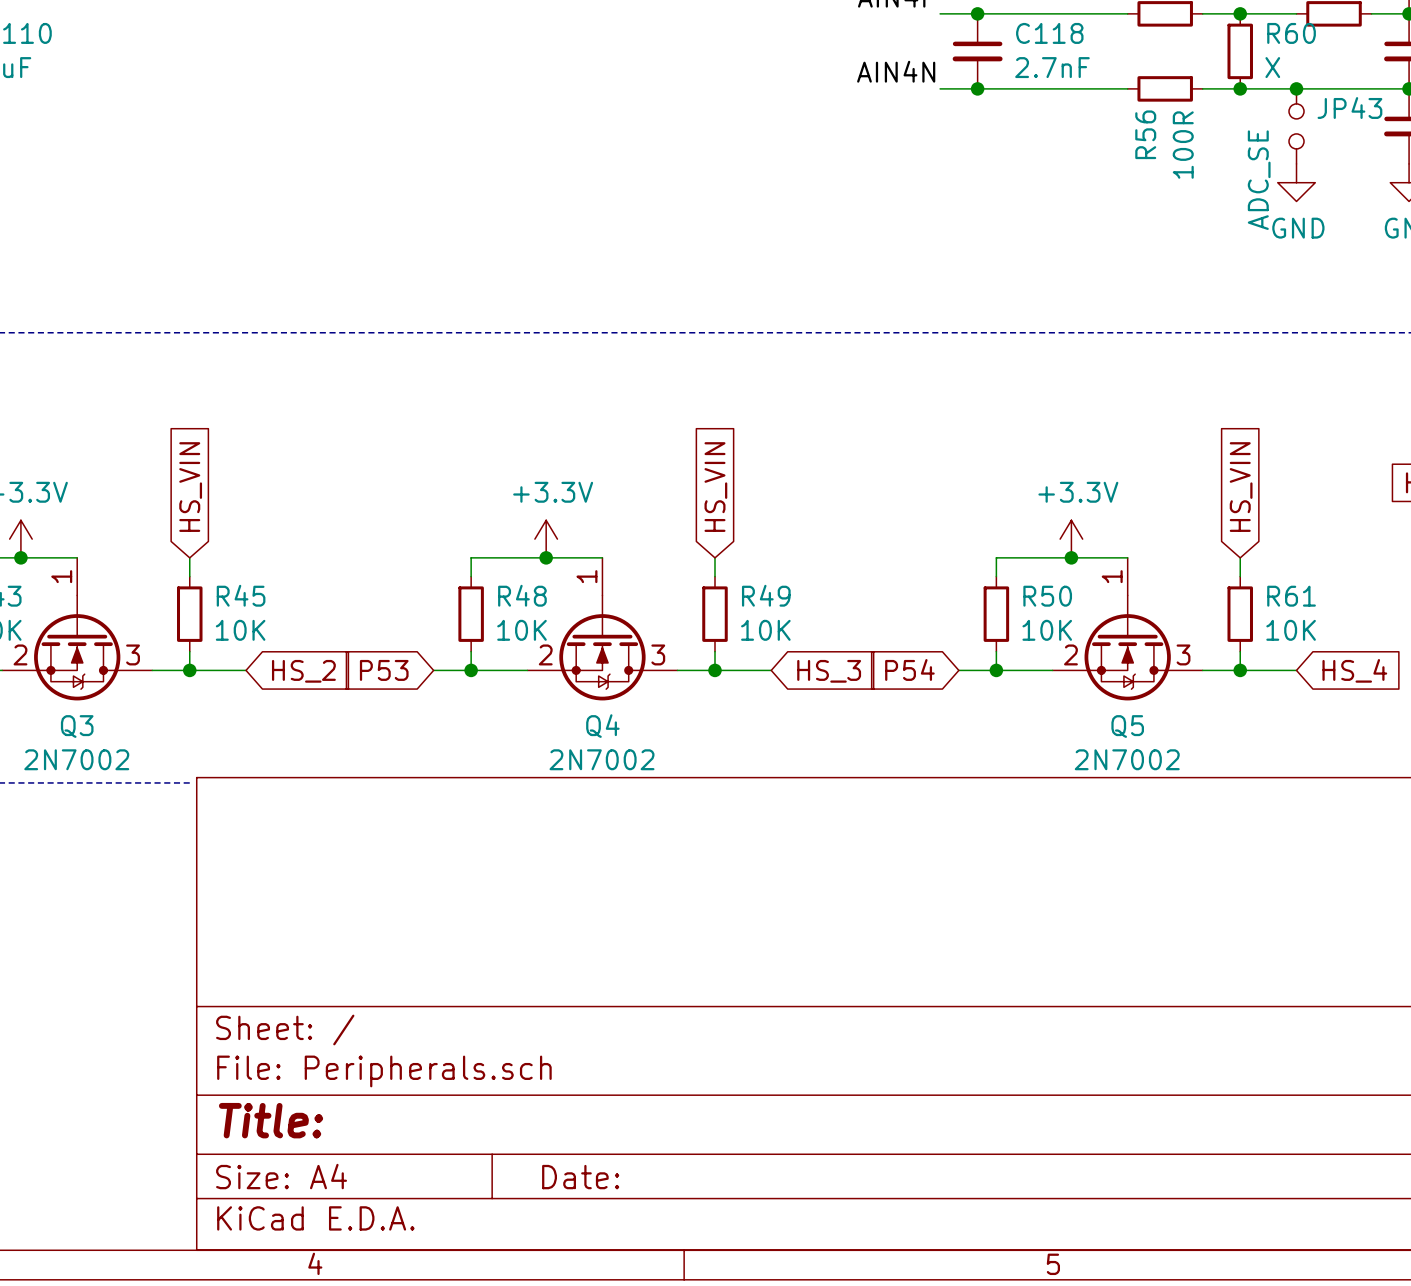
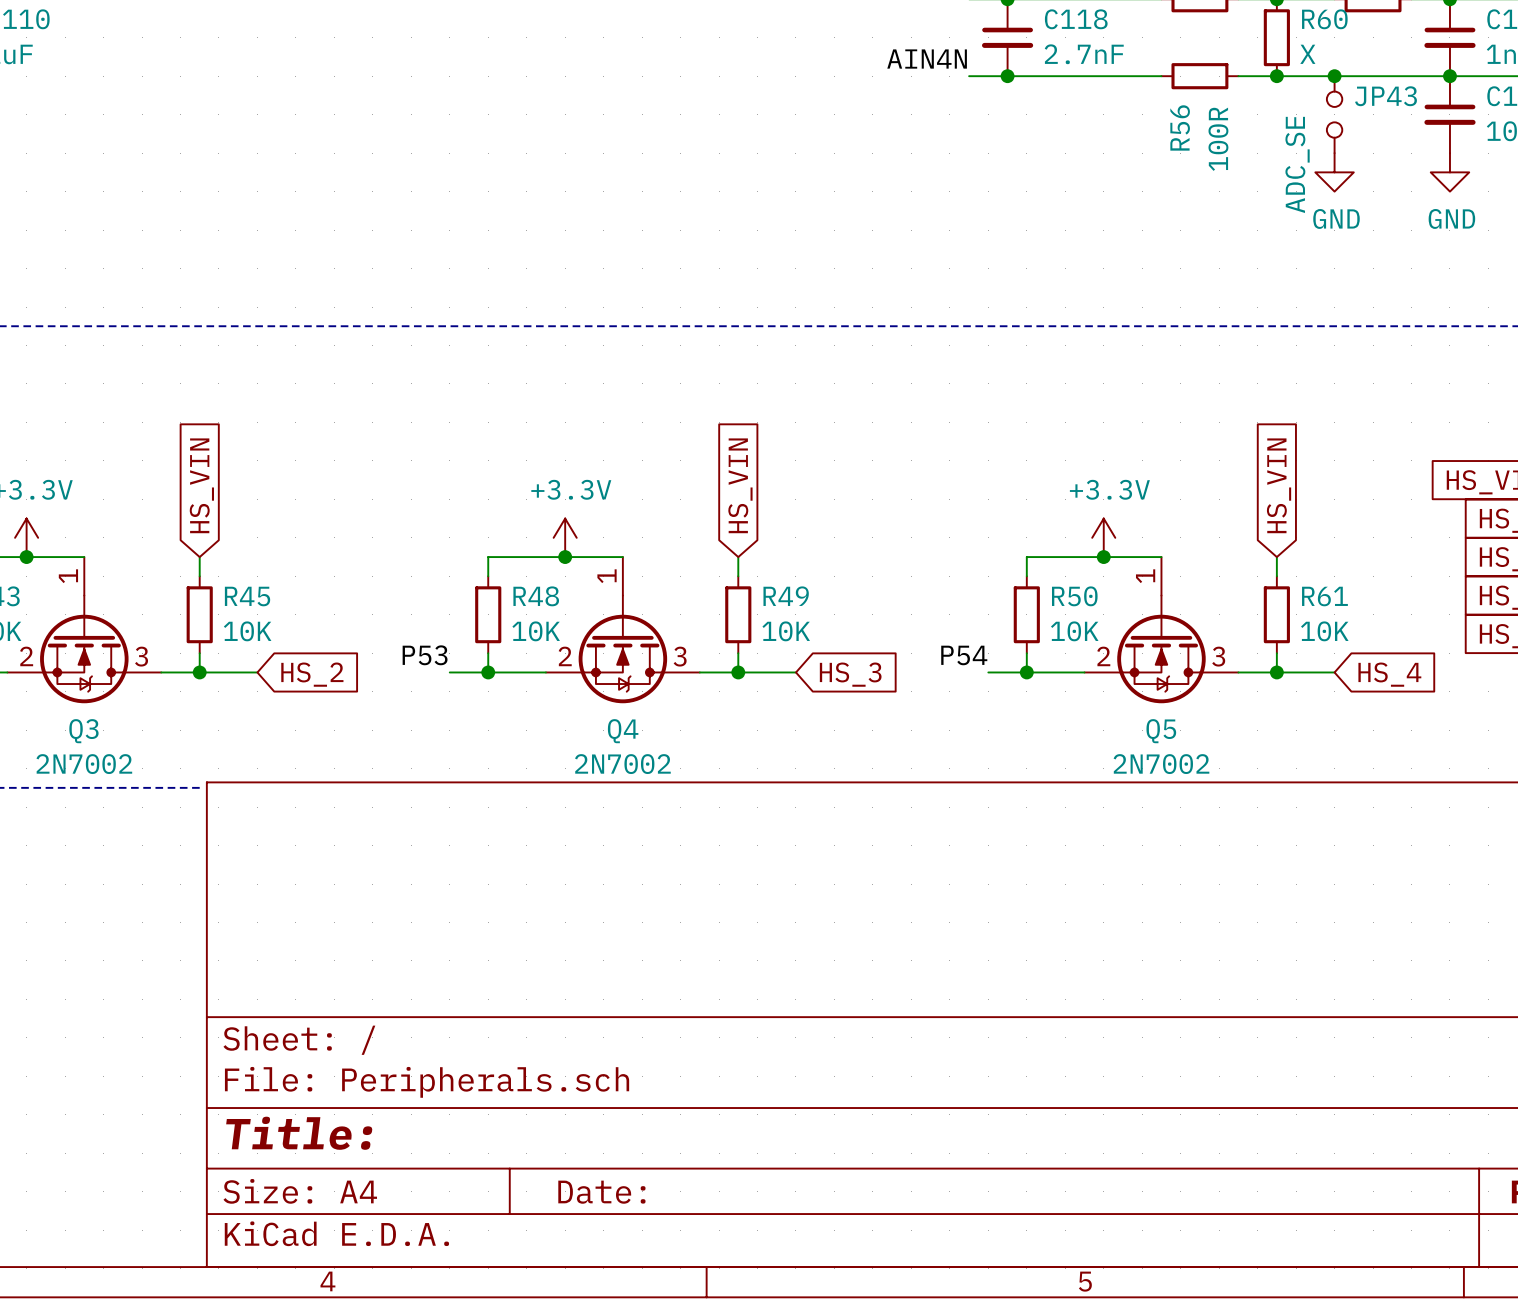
label: none -> P53 (425, 655)
label: none -> P54 (964, 655)
global label: P54 (909, 669) -> none
global label: P53 (384, 670) -> none

